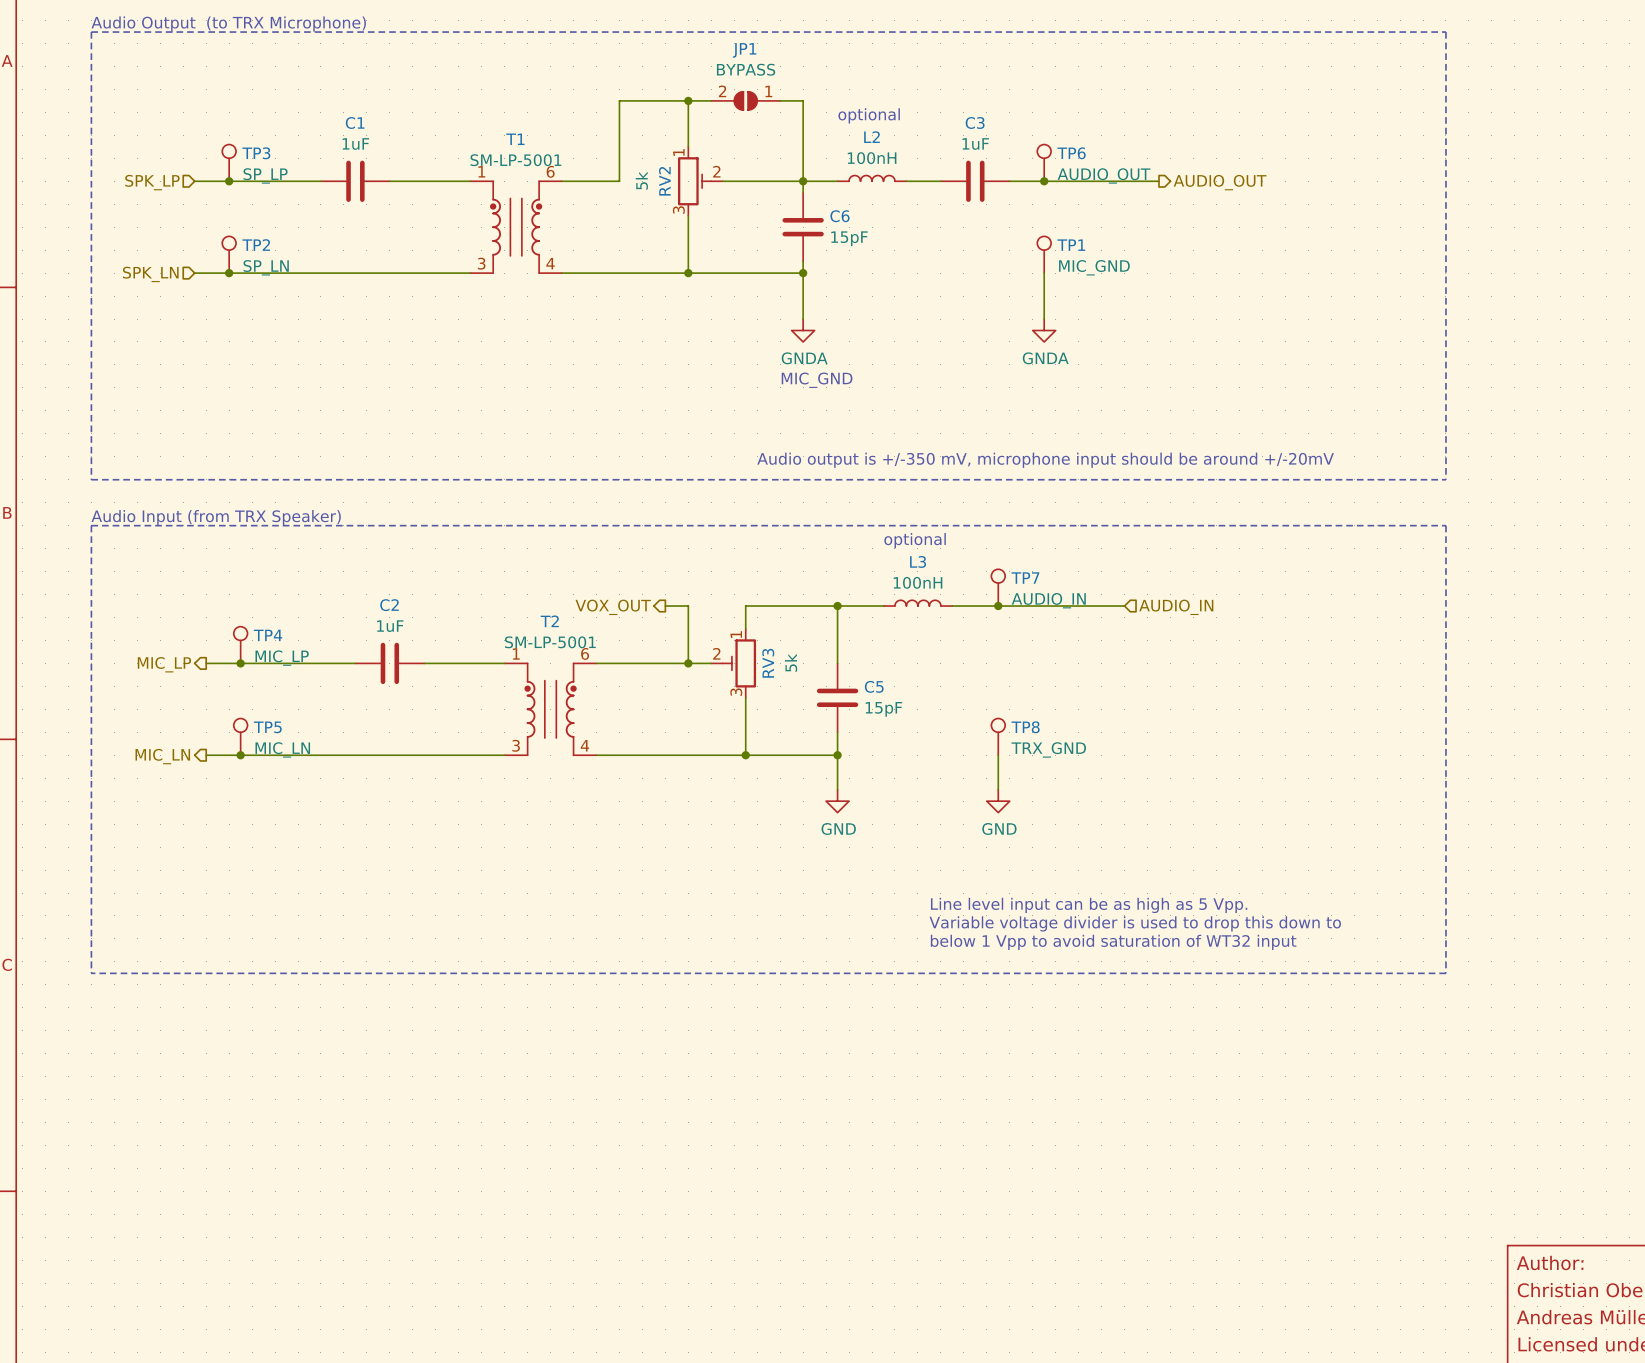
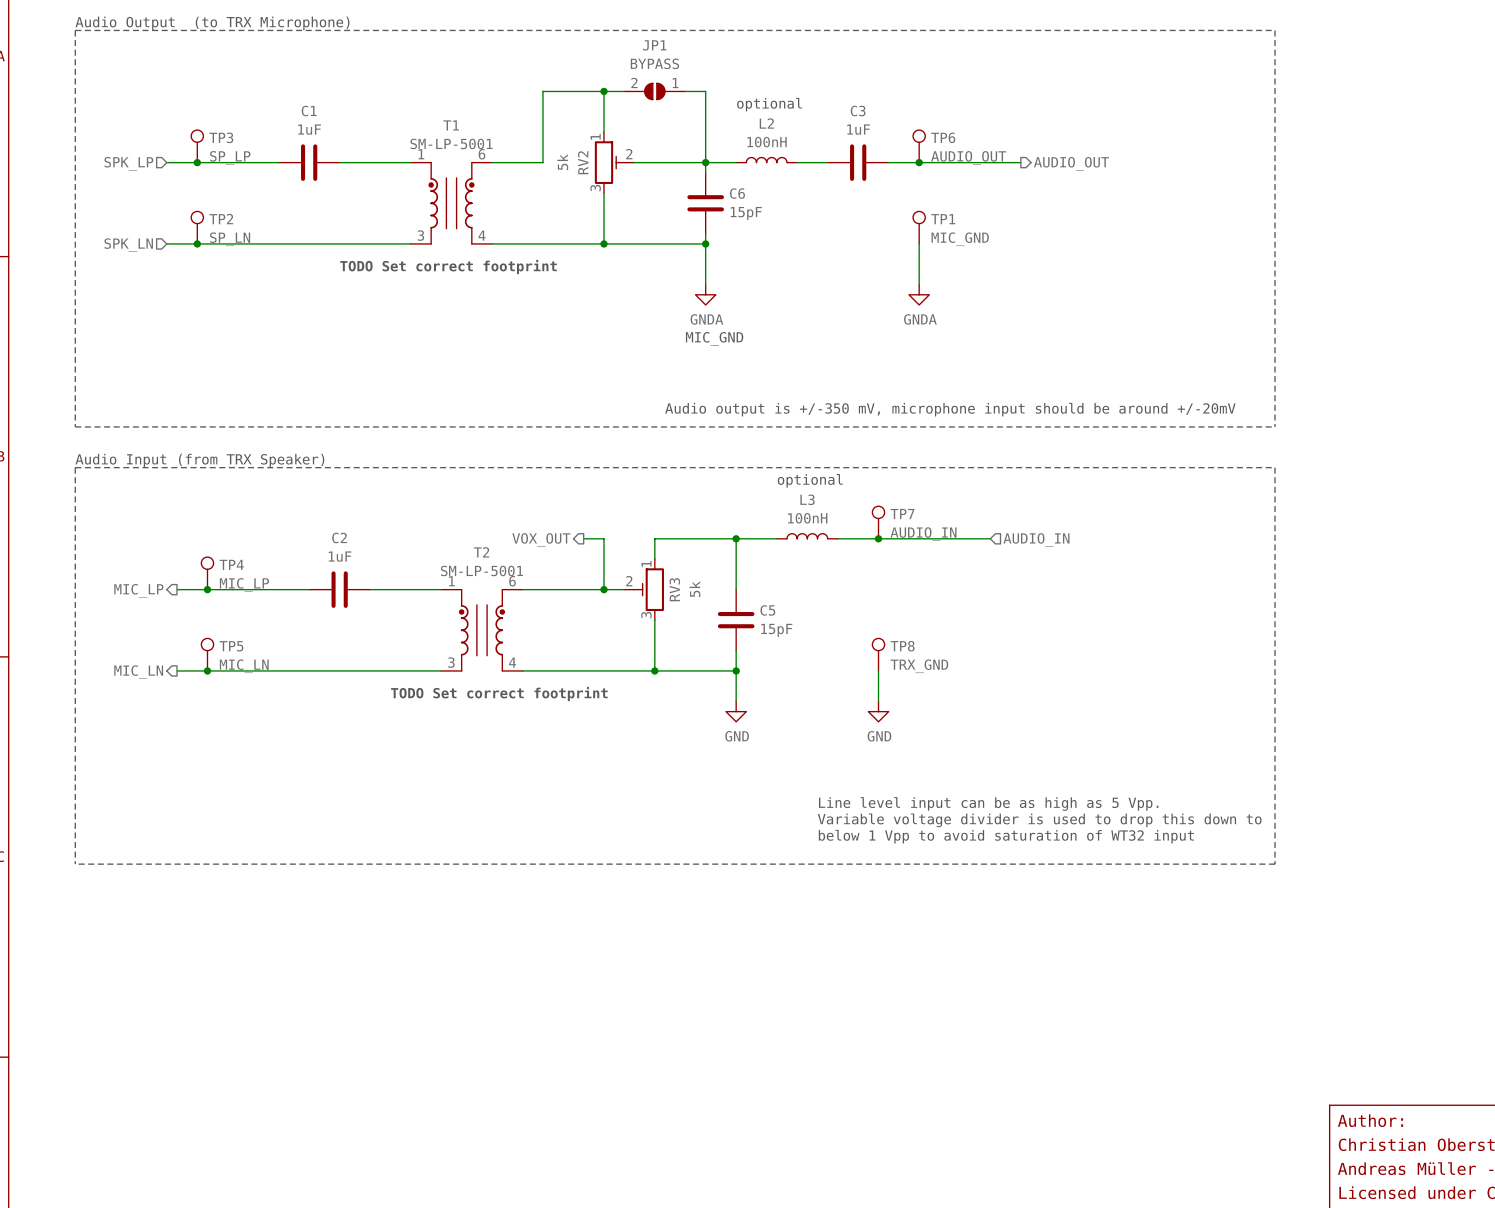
text: none -> TODO Set correct footprint (448, 266)
text: none -> TODO Set correct footprint (499, 694)

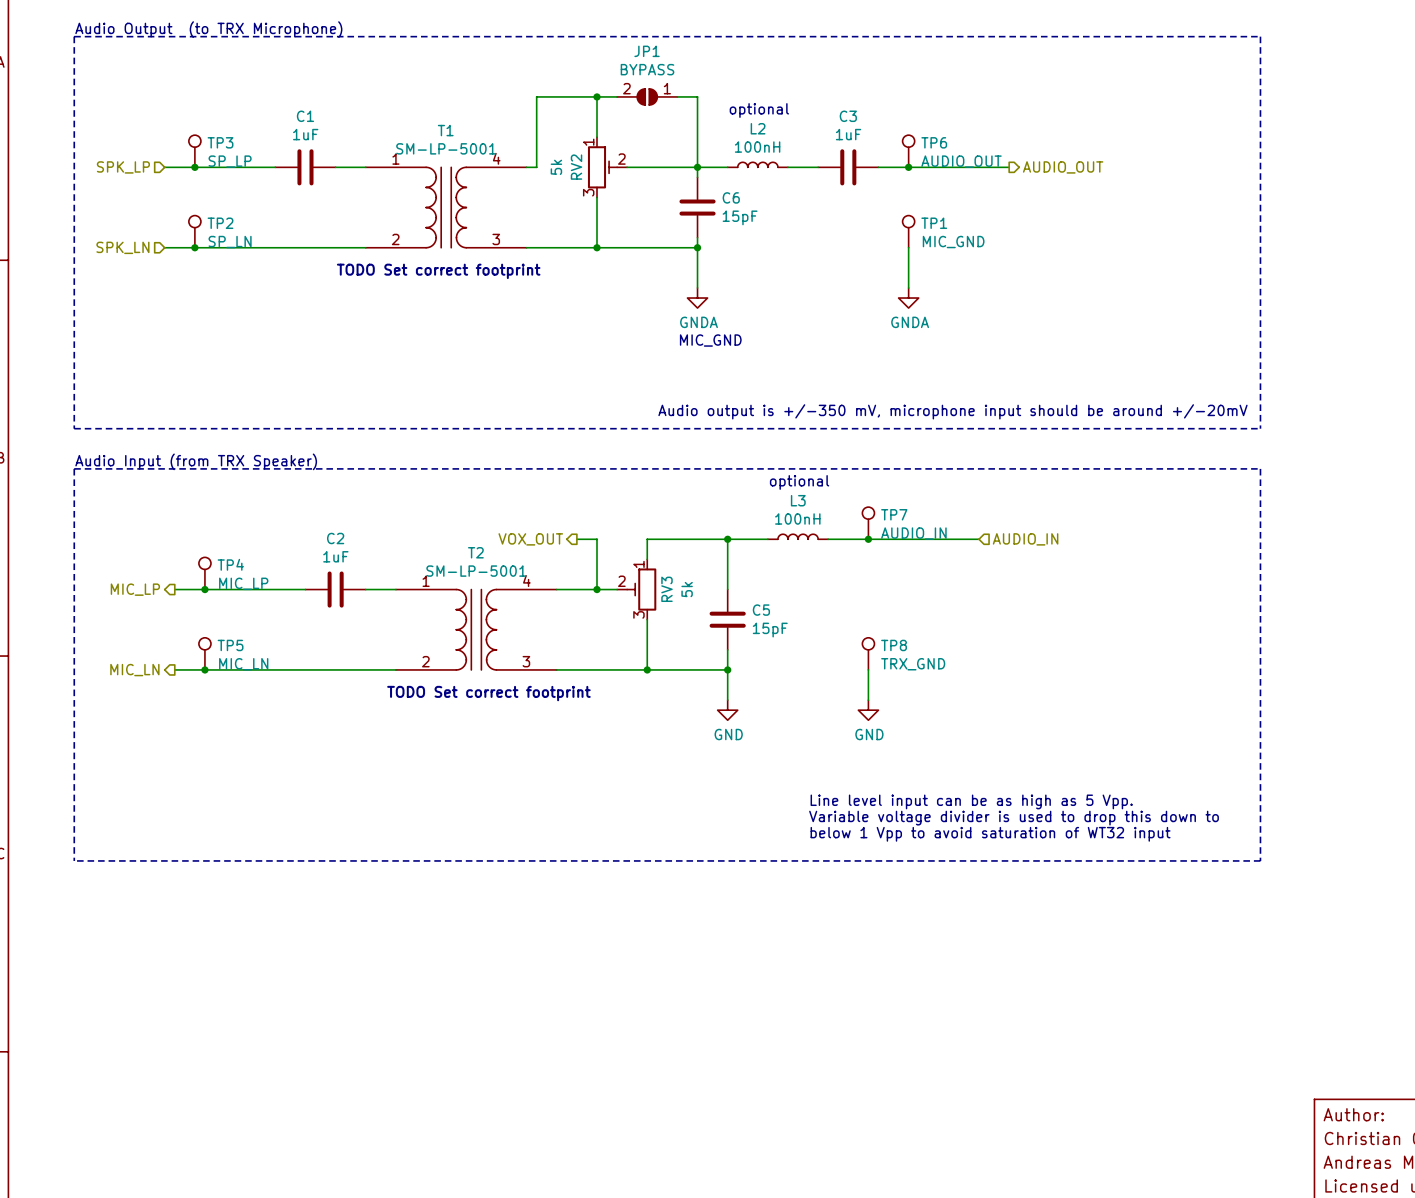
T1 symbol: [410, 162, 493, 244] -> [365, 167, 527, 248]
T2 symbol: [441, 589, 523, 671] -> [395, 589, 557, 670]

